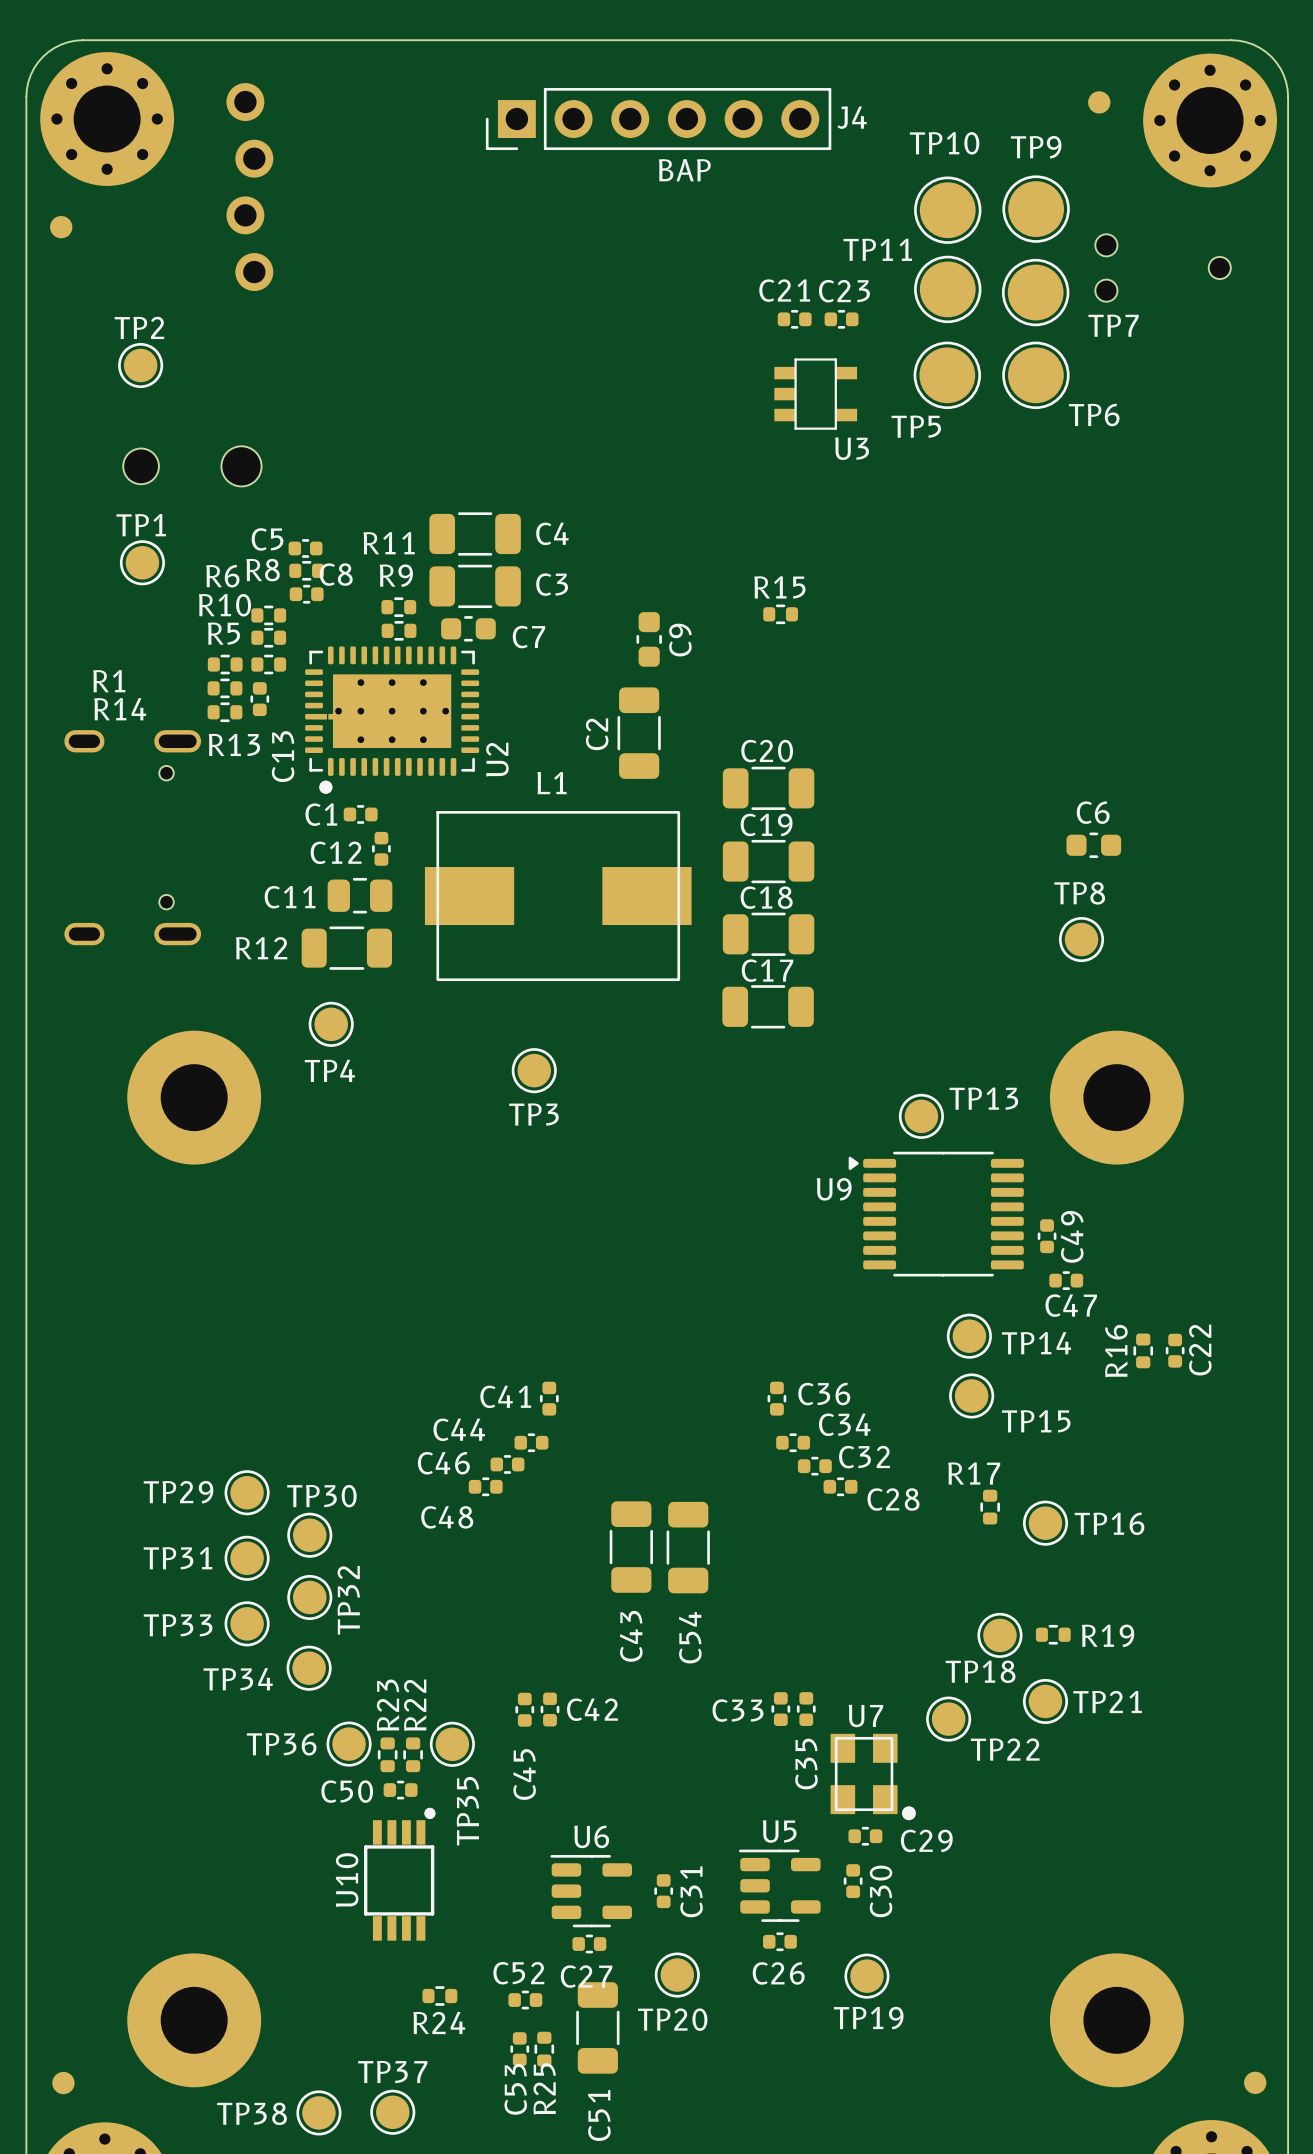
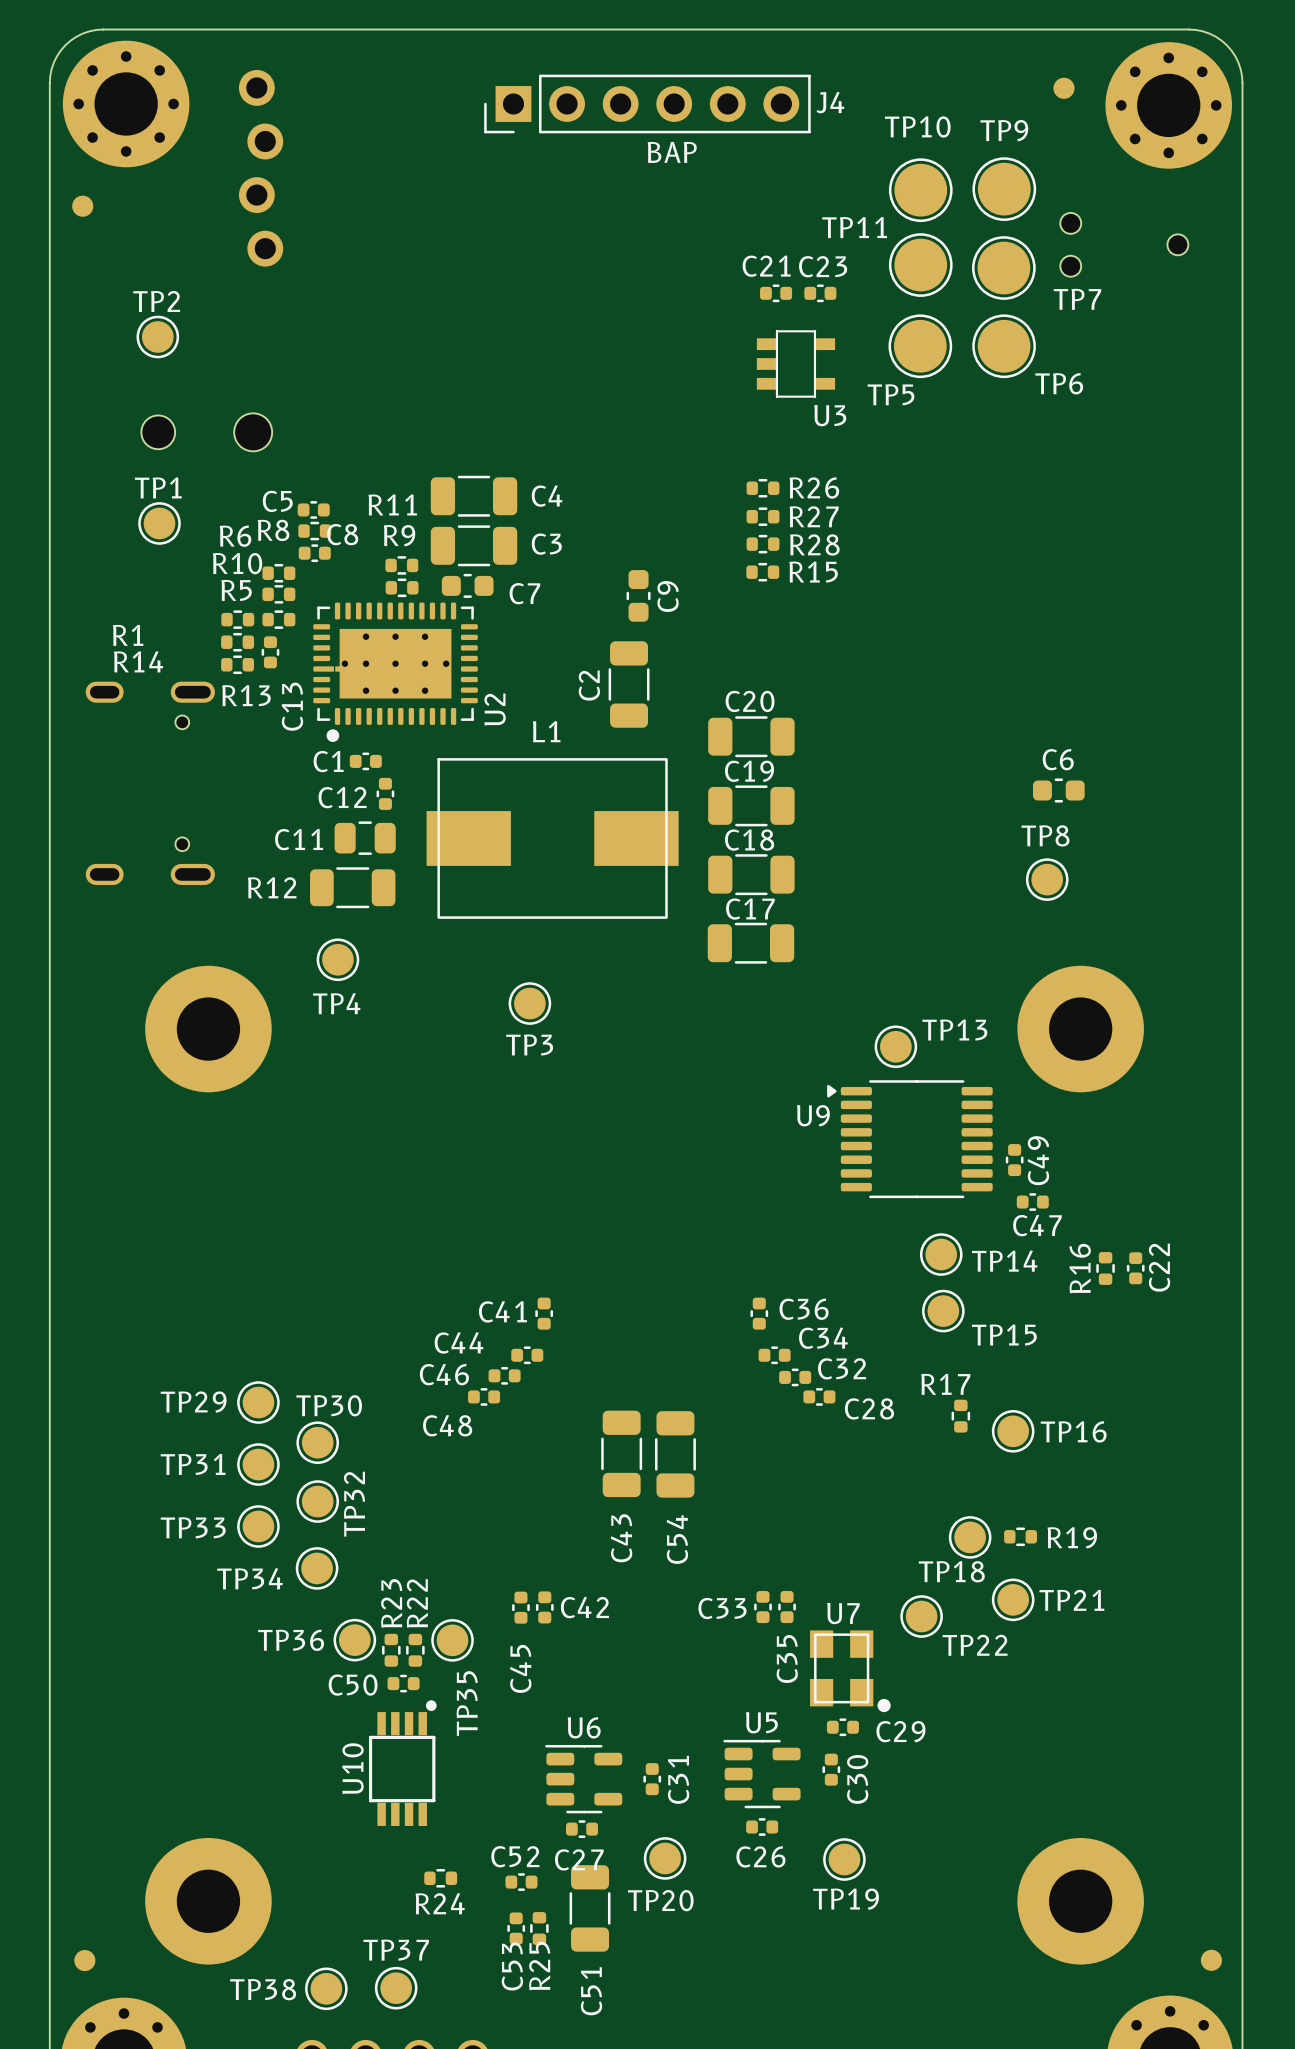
R26: none -> (762, 488)
R27: none -> (762, 516)
R28: none -> (762, 544)
R15 name position: R15 (779, 587) -> R15 (813, 572)

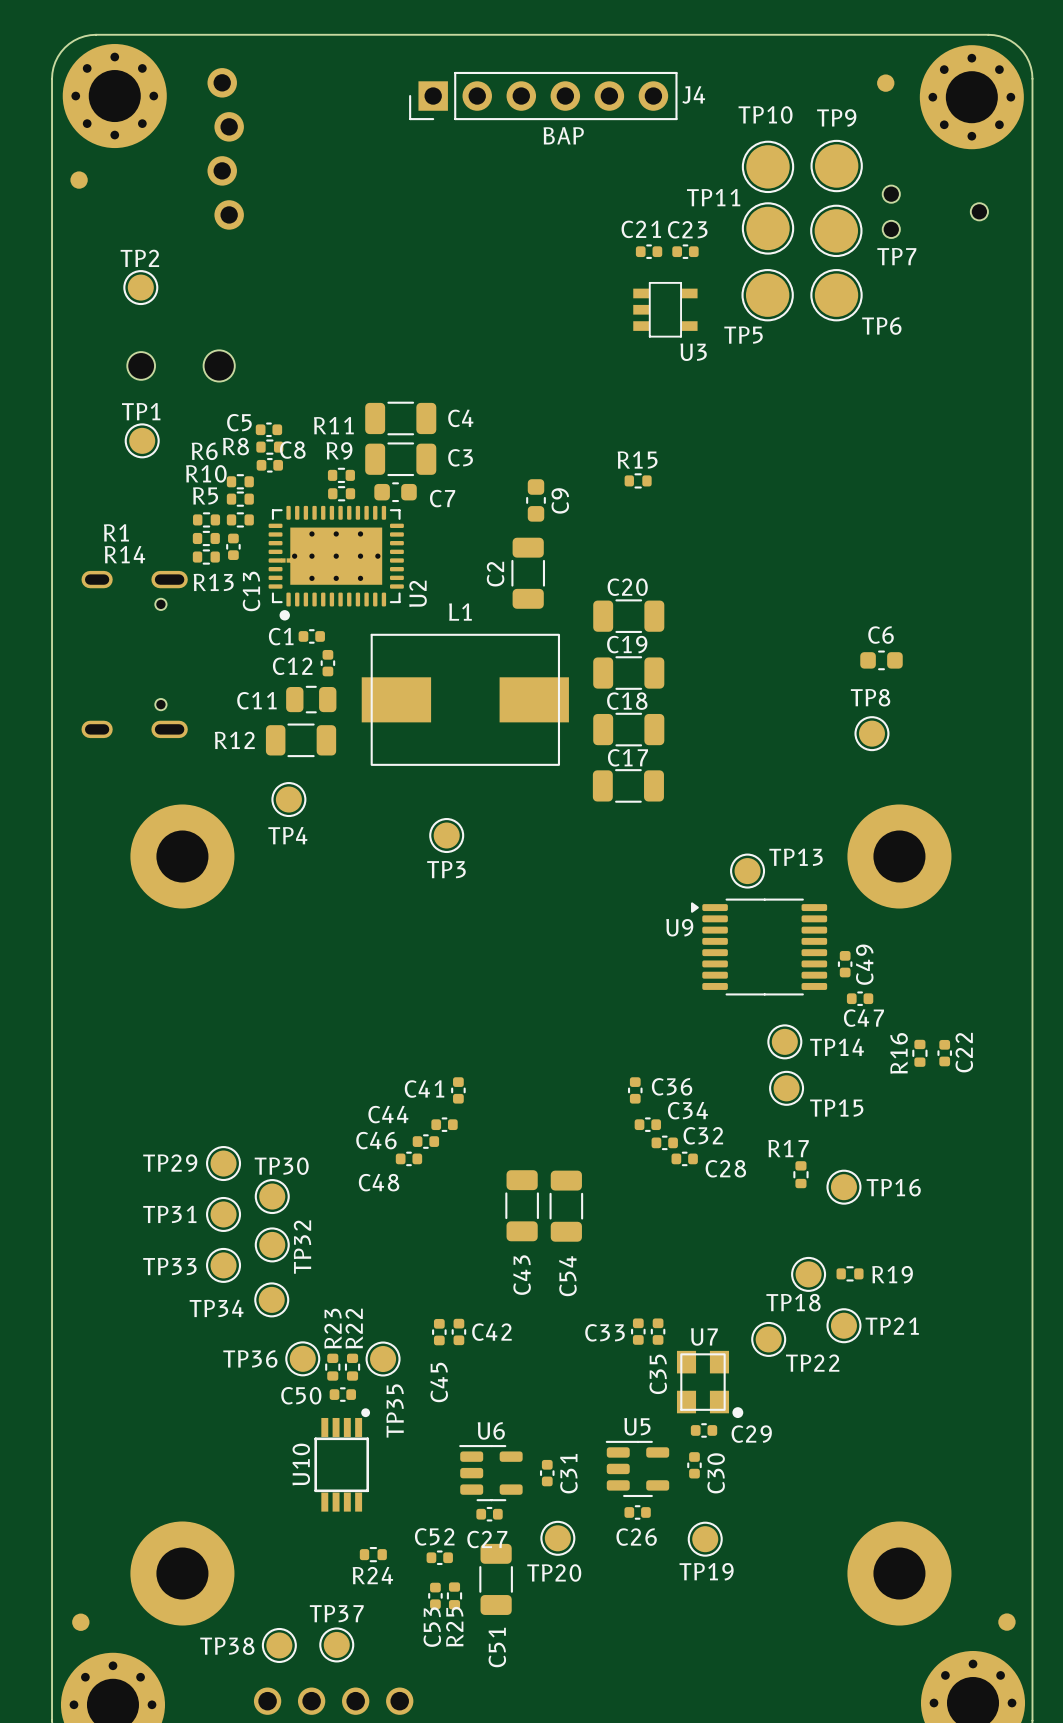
R26: (762, 488) -> none
R27: (762, 516) -> none
R28: (762, 544) -> none
R15 name position: R15 (813, 572) -> R15 (637, 459)

